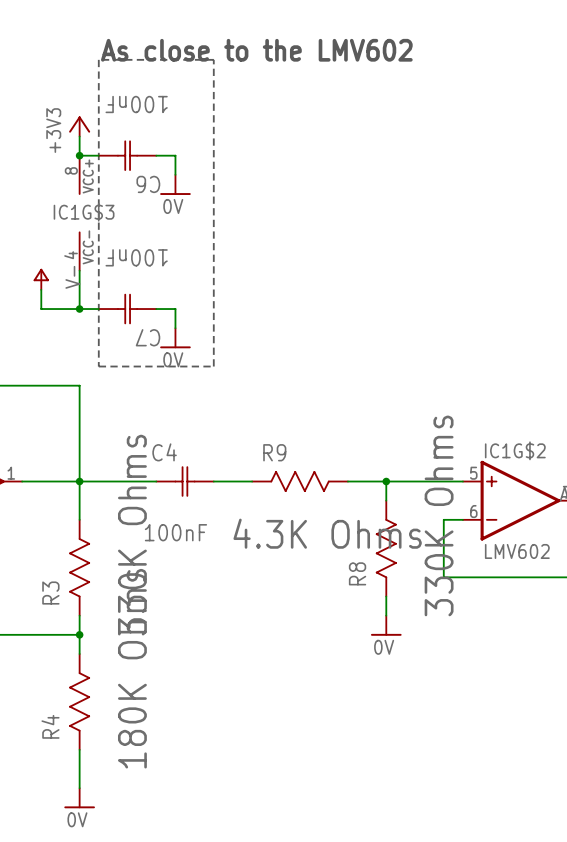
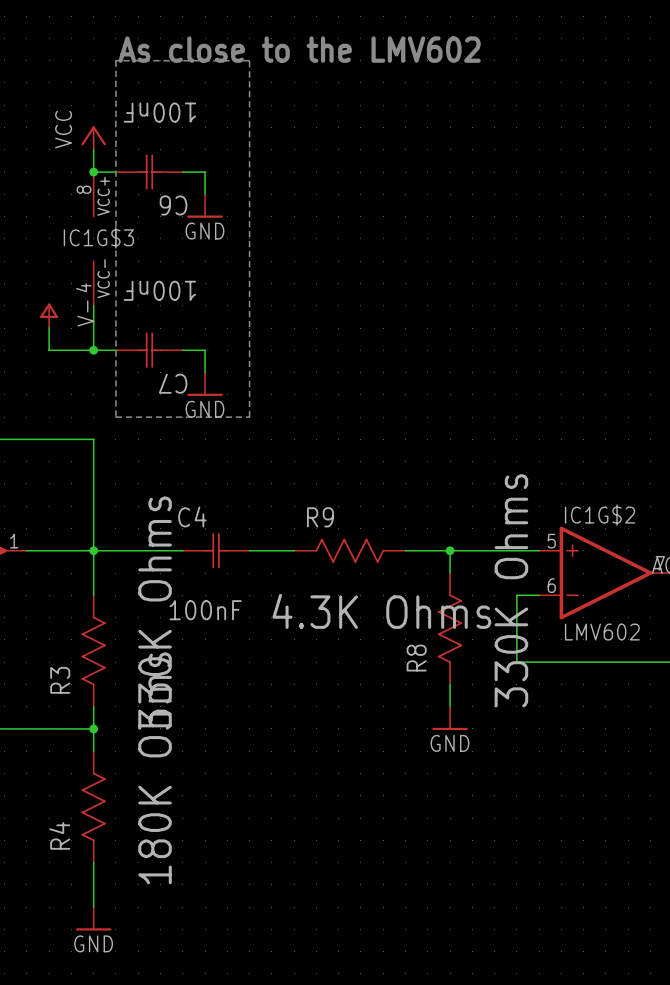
power symbol: +3V3 (79, 126) -> VCC (93, 138)
power symbol: 0V (175, 184) -> GND (205, 206)
power symbol: 0V (175, 338) -> GND (205, 384)
power symbol: 0V (386, 625) -> GND (450, 718)
power symbol: 0V (79, 798) -> GND (93, 918)

